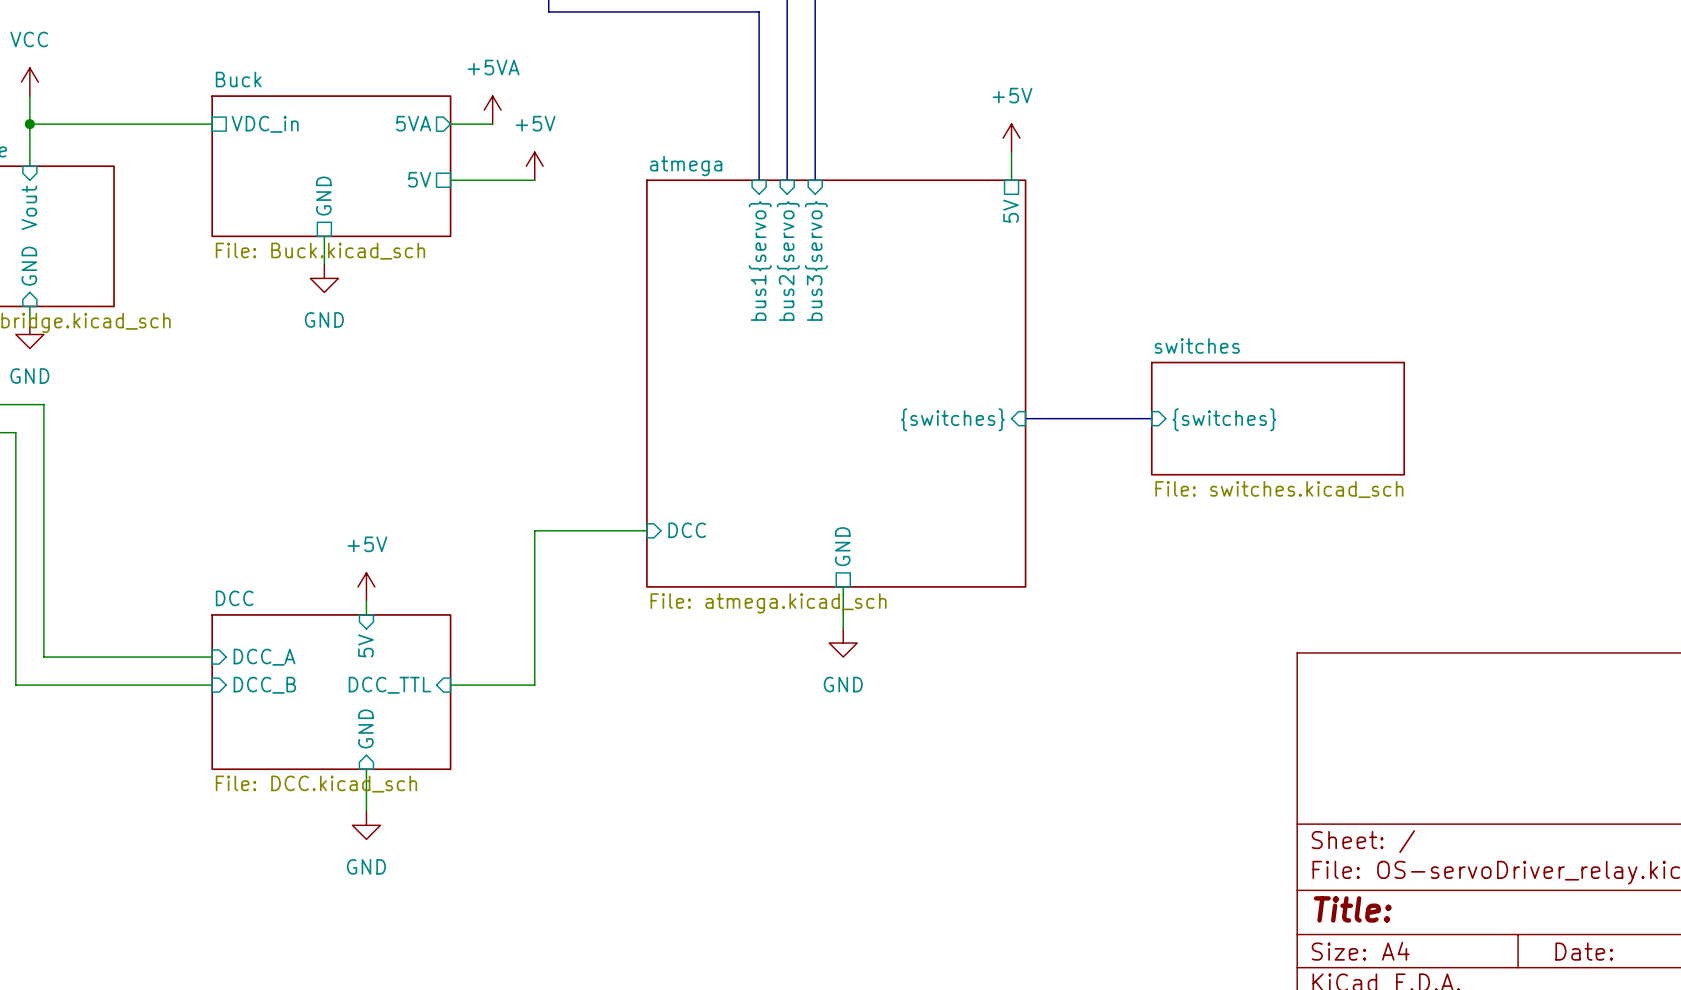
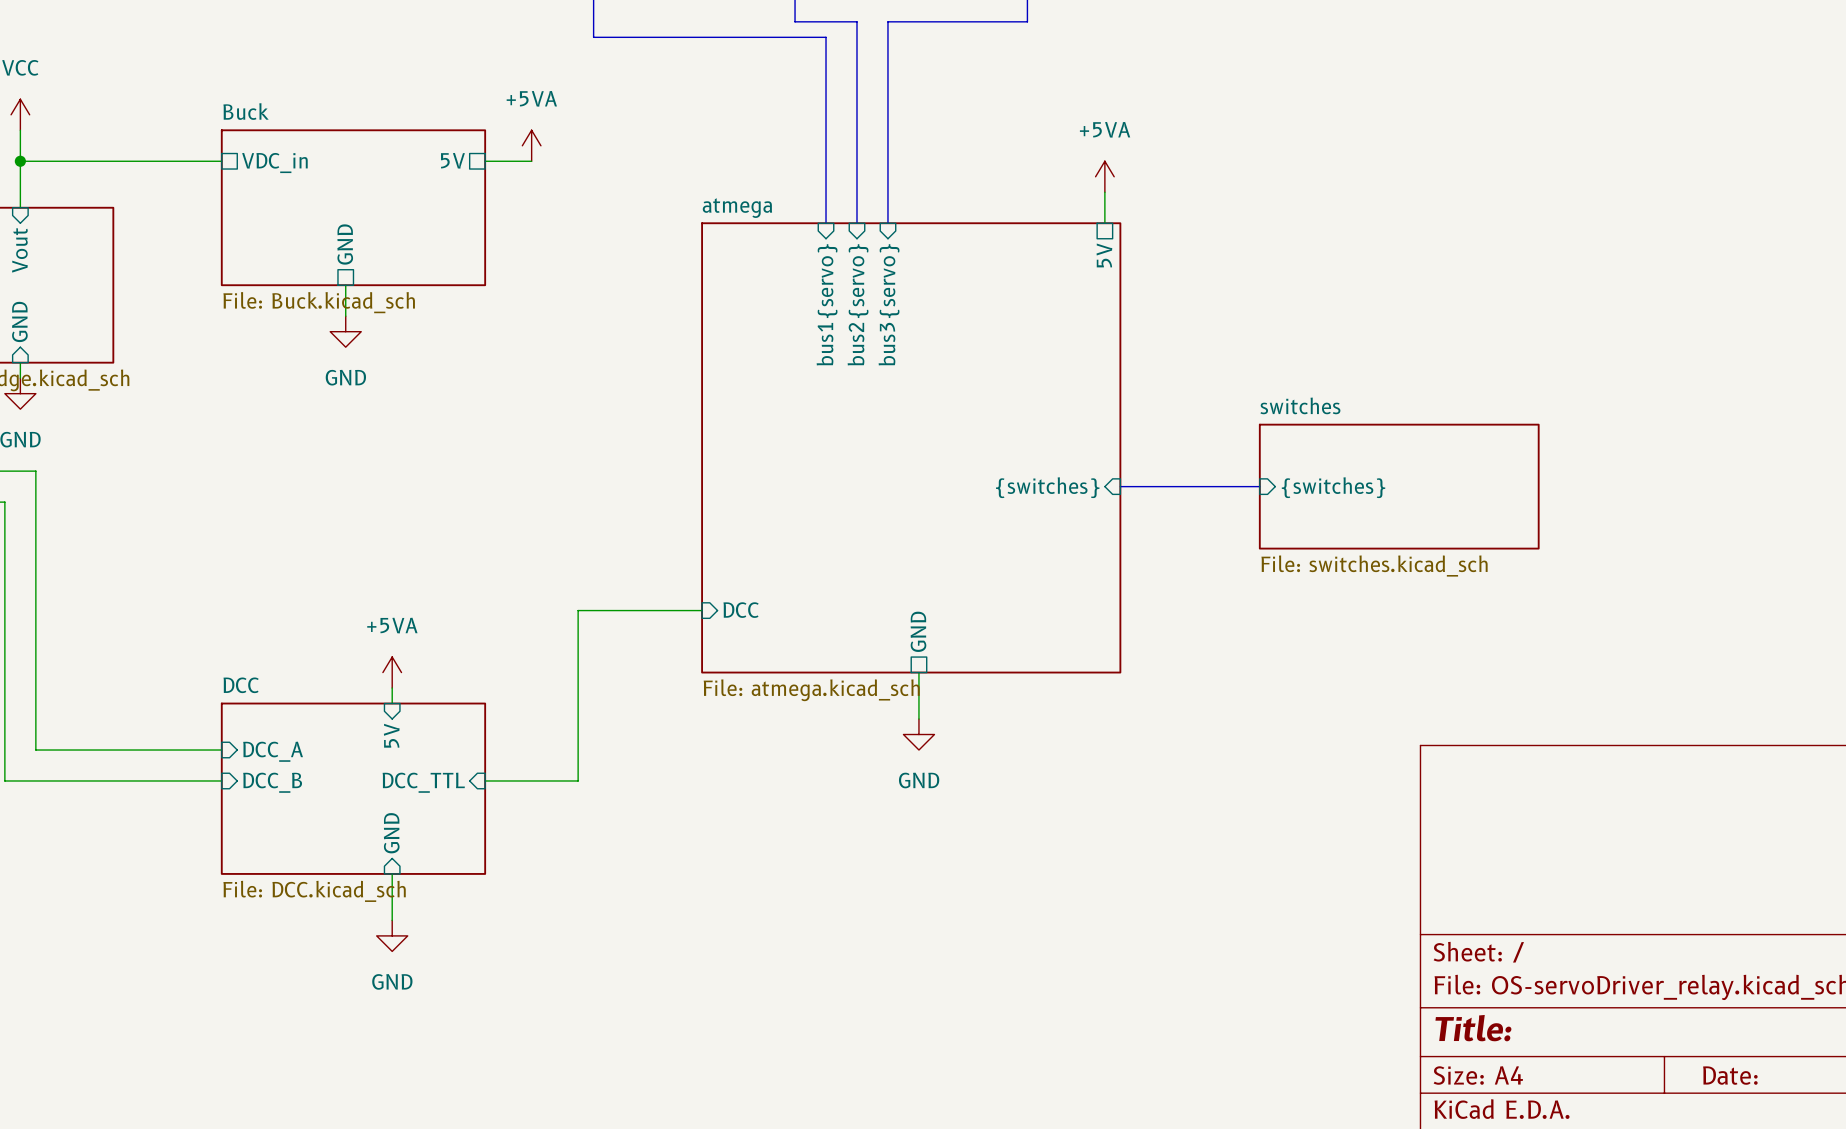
sheet pin shape: output (413, 123) -> passive (452, 160)
sheet pin: 5VA (413, 123) -> 5V (452, 160)
power symbol: +5V (1011, 138) -> +5VA (1104, 176)
power symbol: +5V (534, 166) -> none
sheet pin: 5V (419, 179) -> none
wire: (450, 180) (534, 180) -> none
power symbol: +5V (366, 586) -> +5VA (392, 672)

